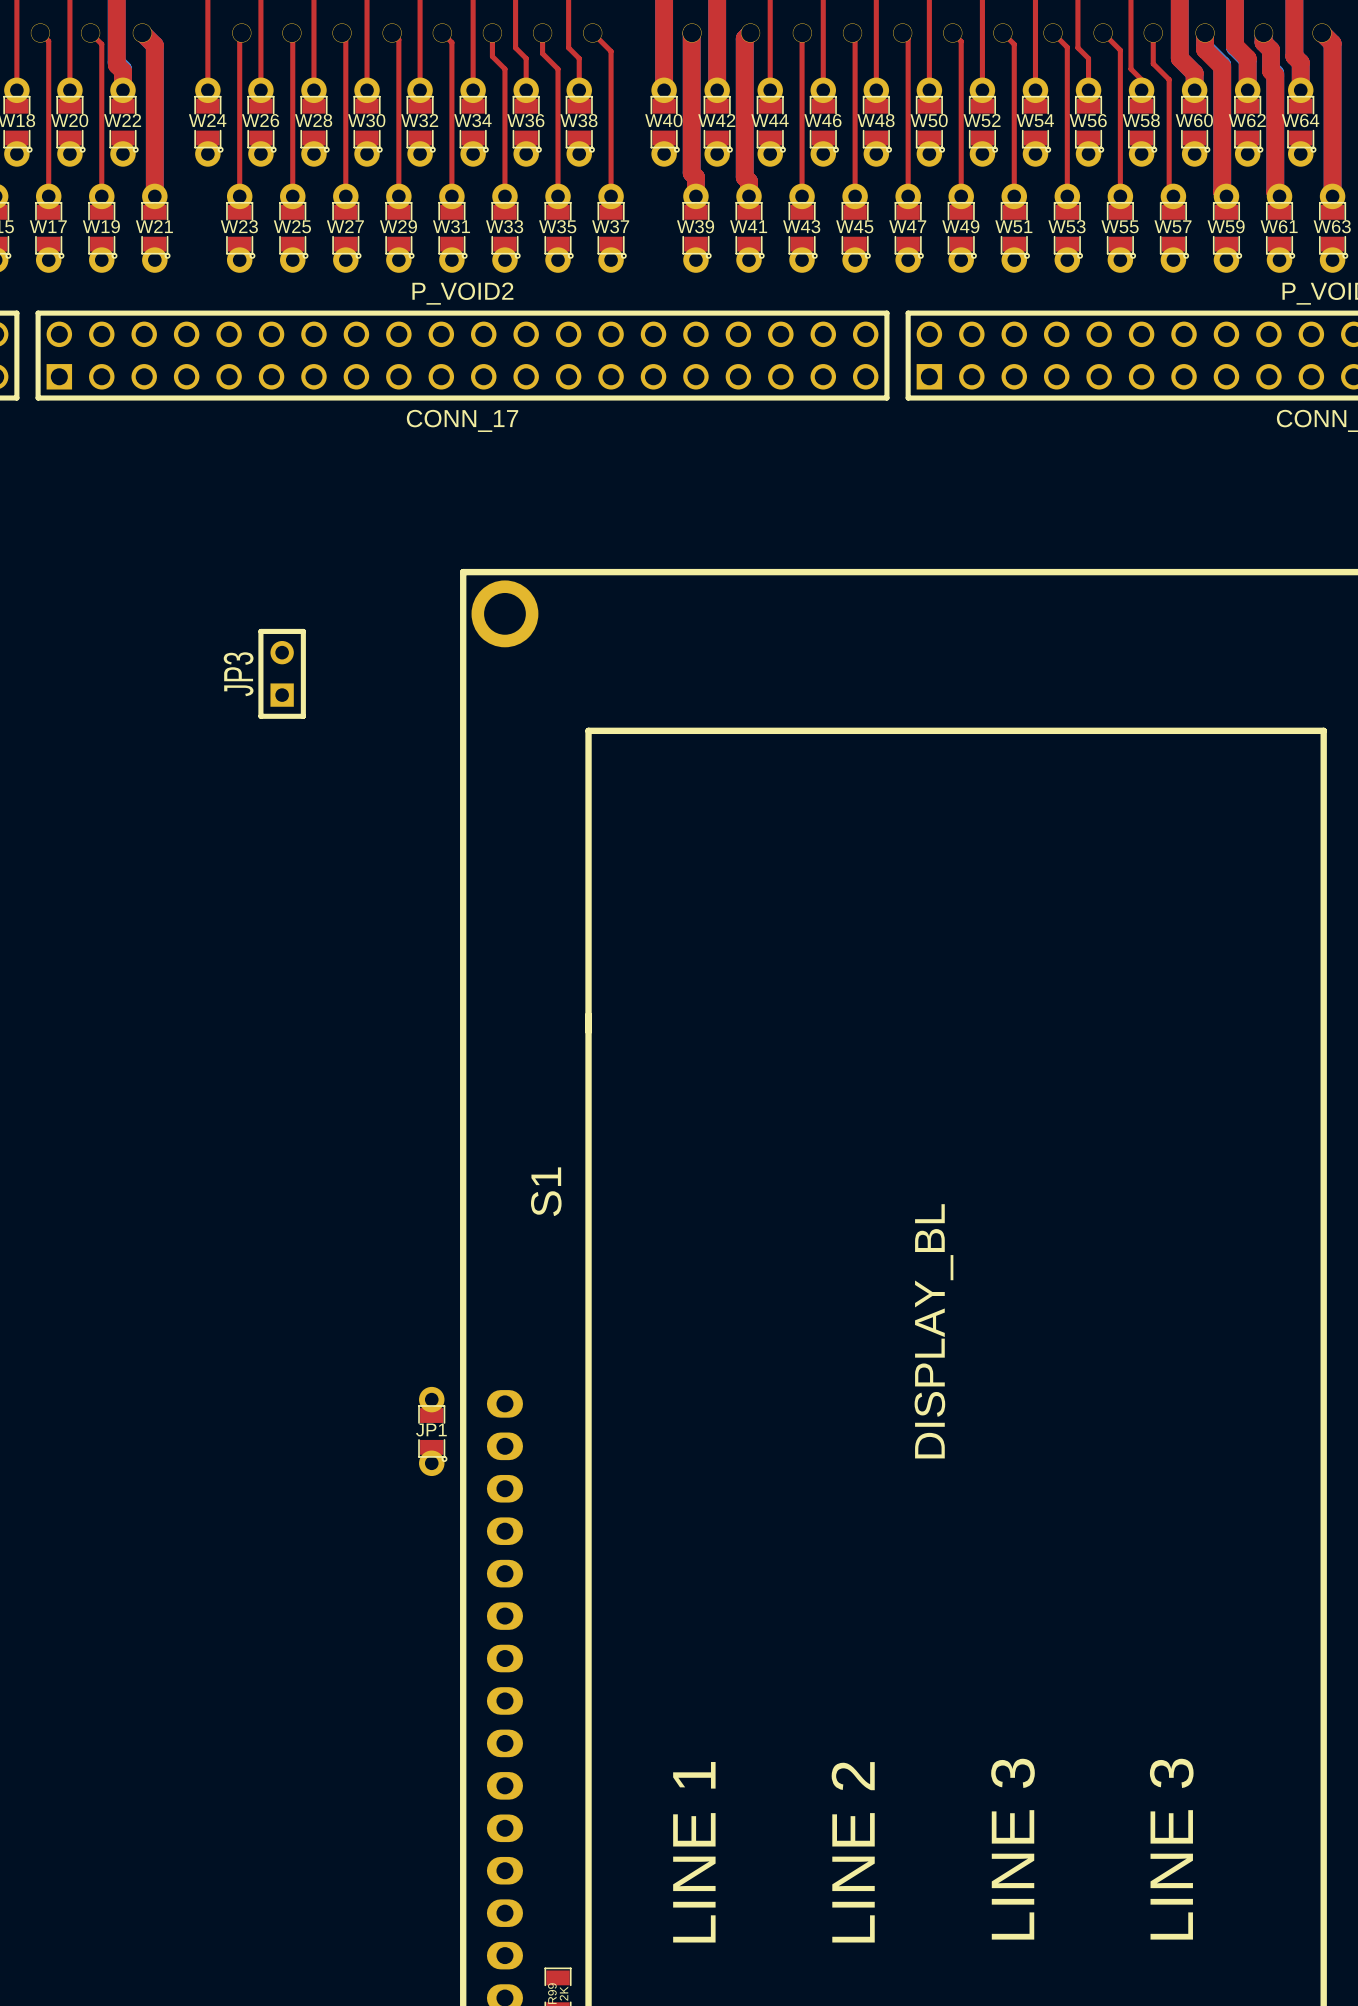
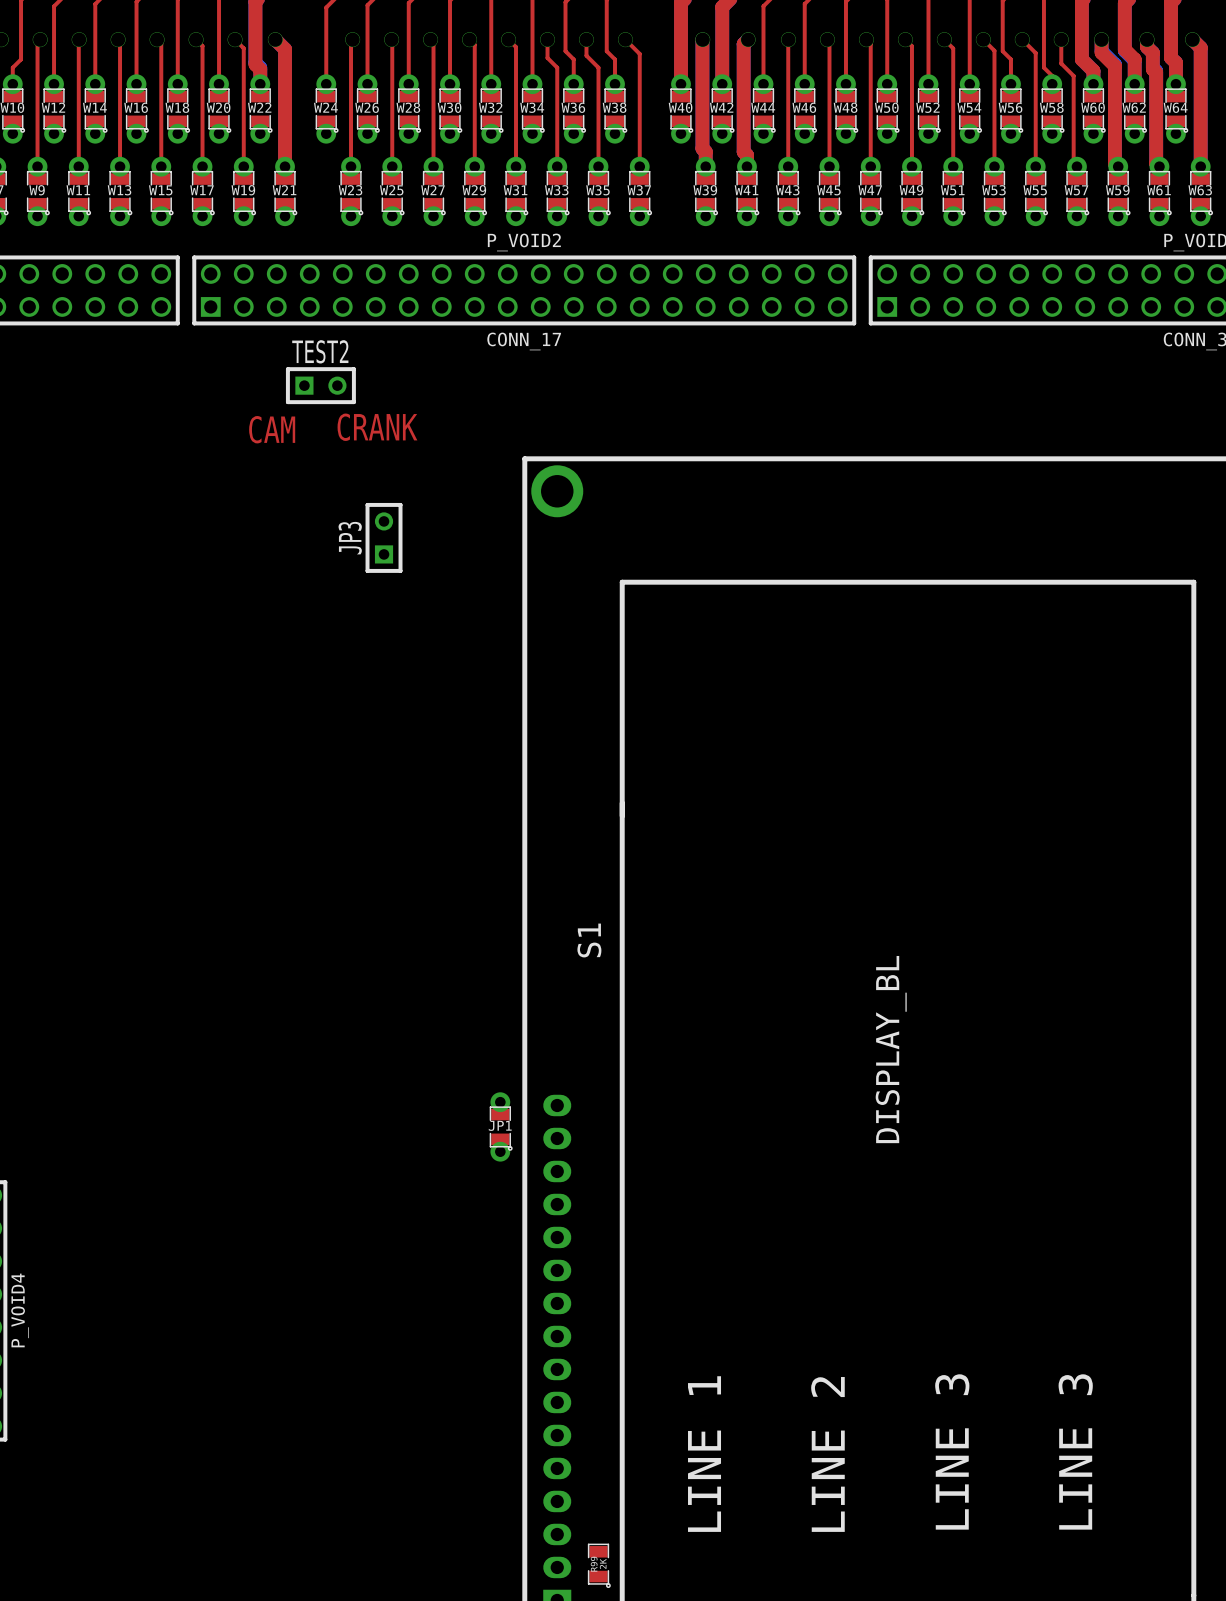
TEST2: none -> (320, 385)
text: none -> CRANK (377, 427)
text: none -> CAM (272, 429)

